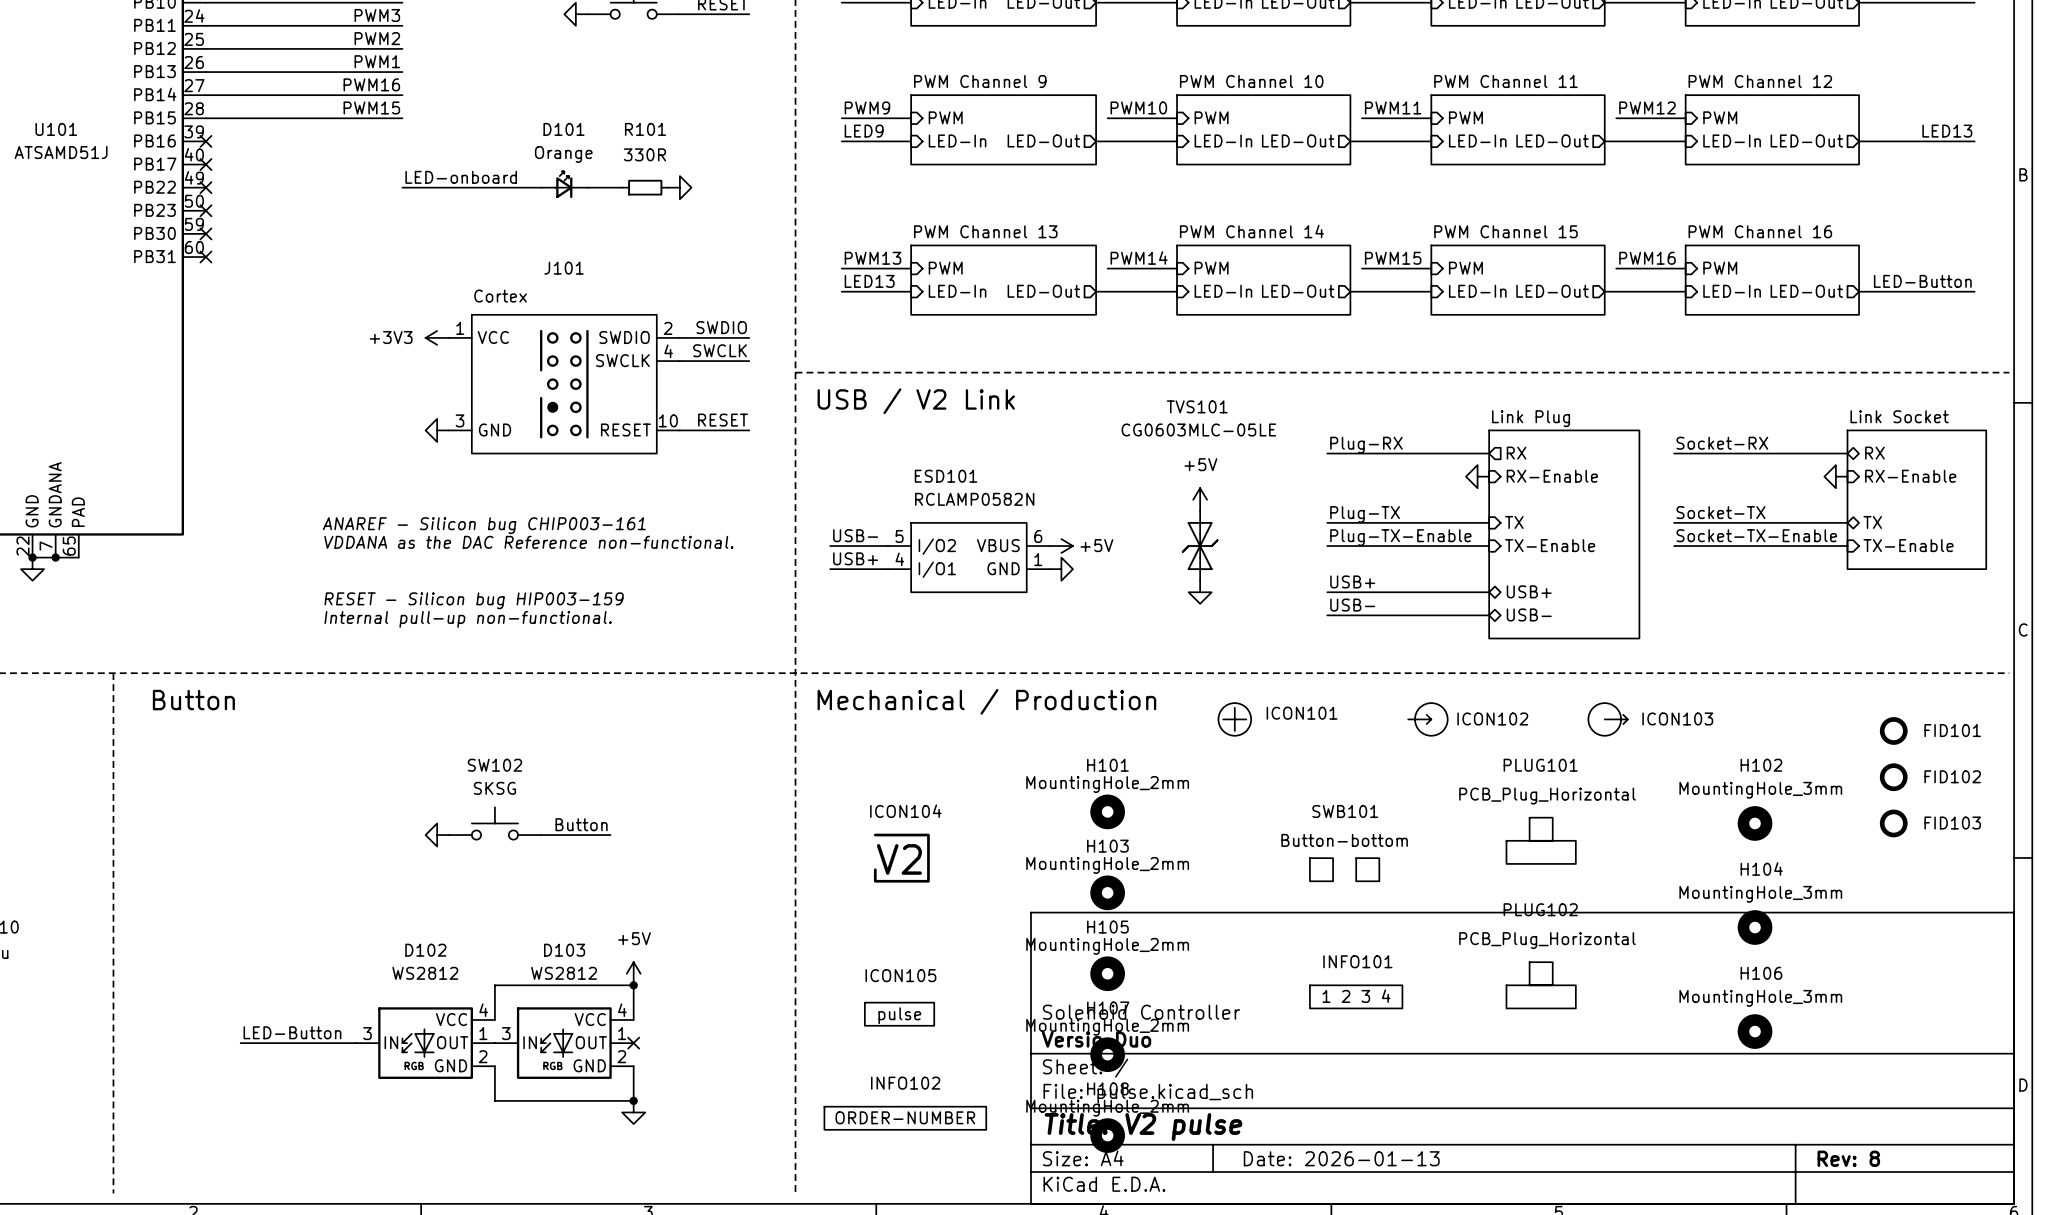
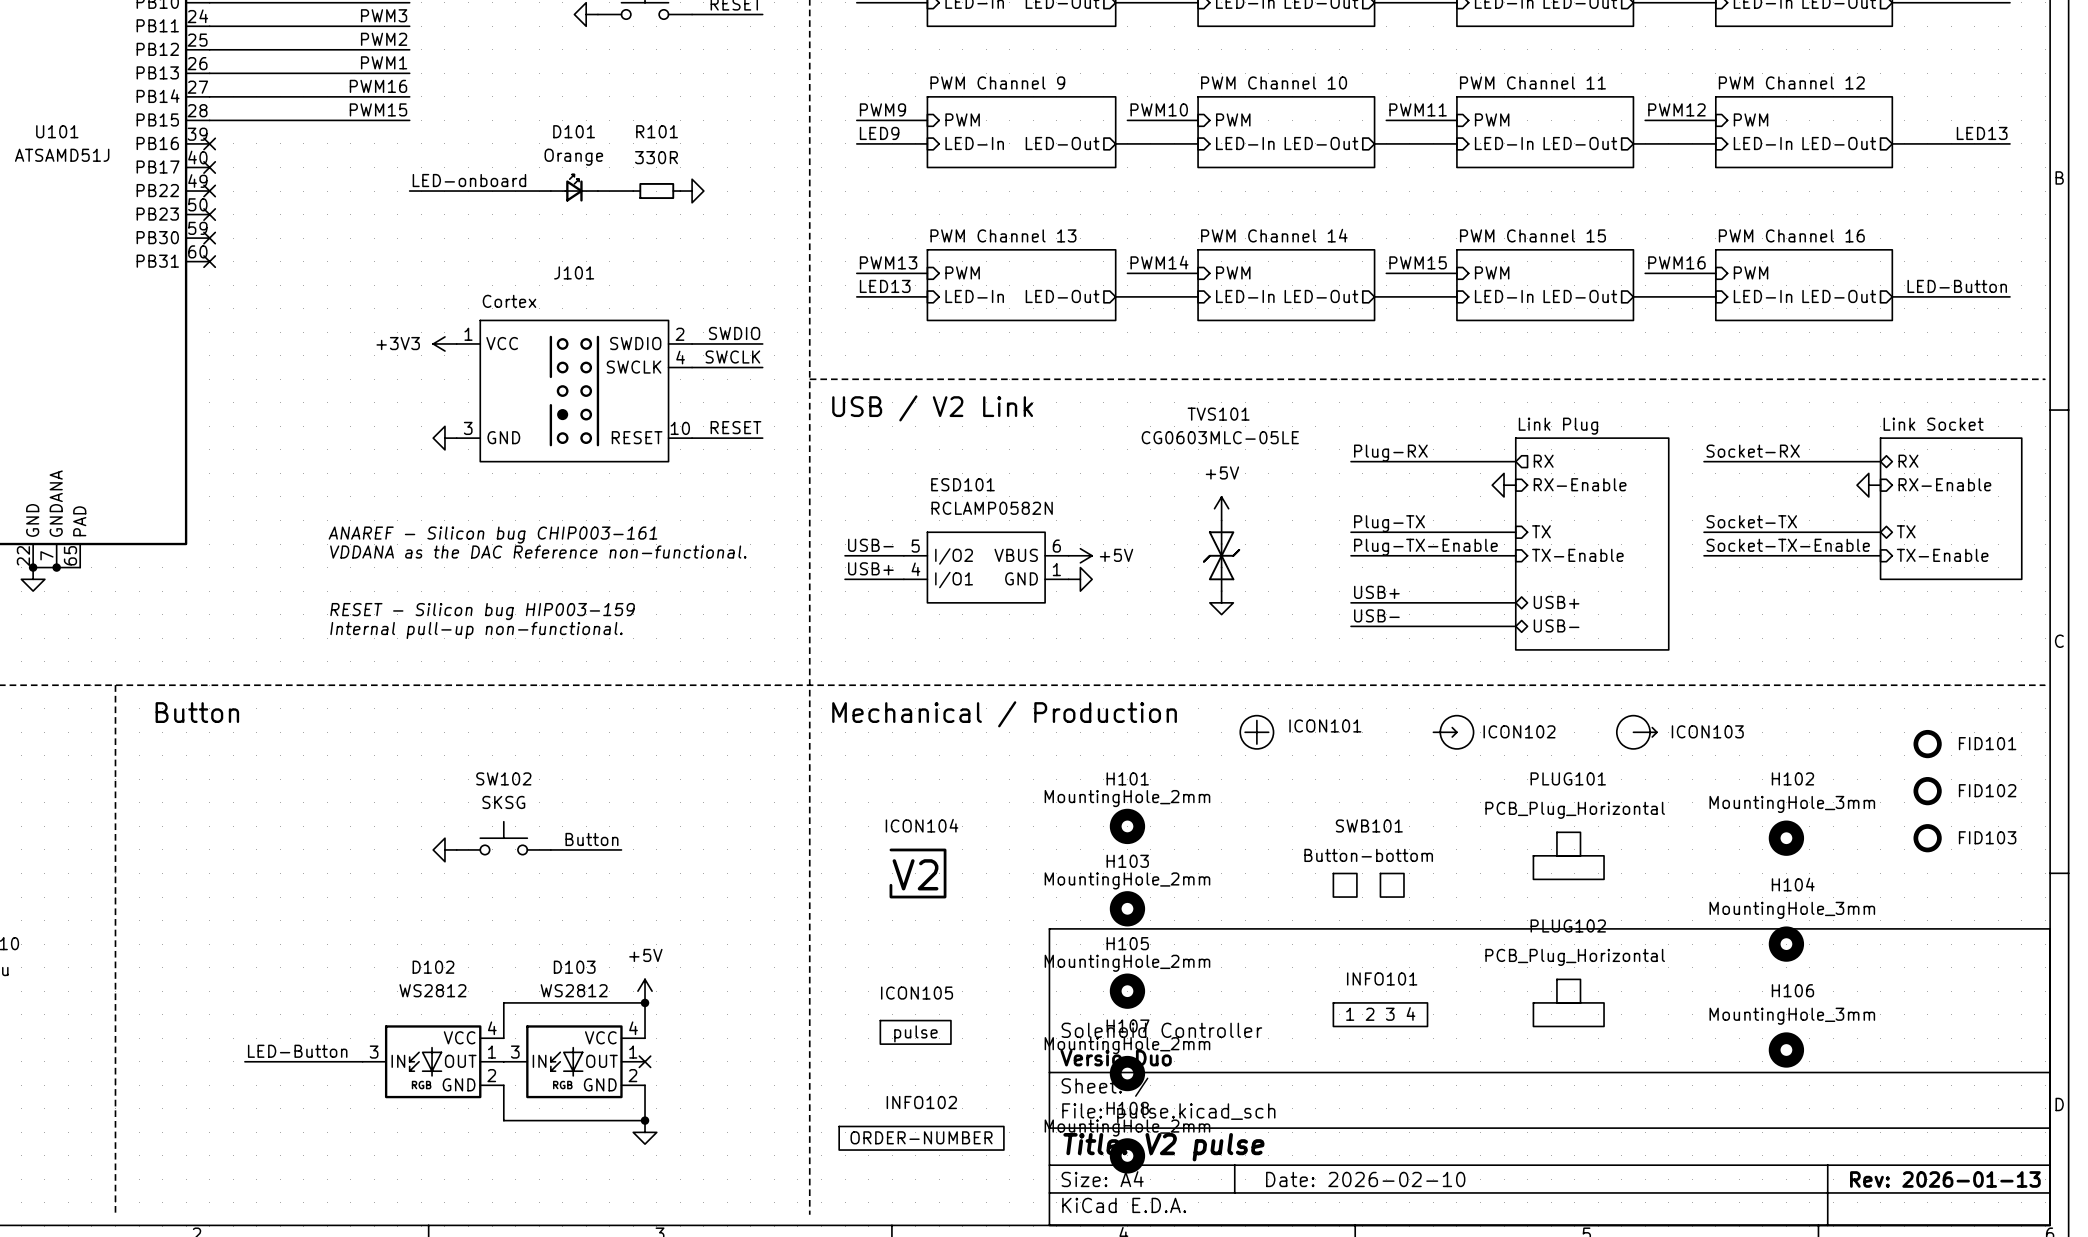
title block: Date: 2026-01-13 (1341, 1158) -> Date: 2026-02-10 (1365, 1179)
title block: Rev: 8 (1848, 1158) -> Rev: 2026-01-13 (1945, 1179)

